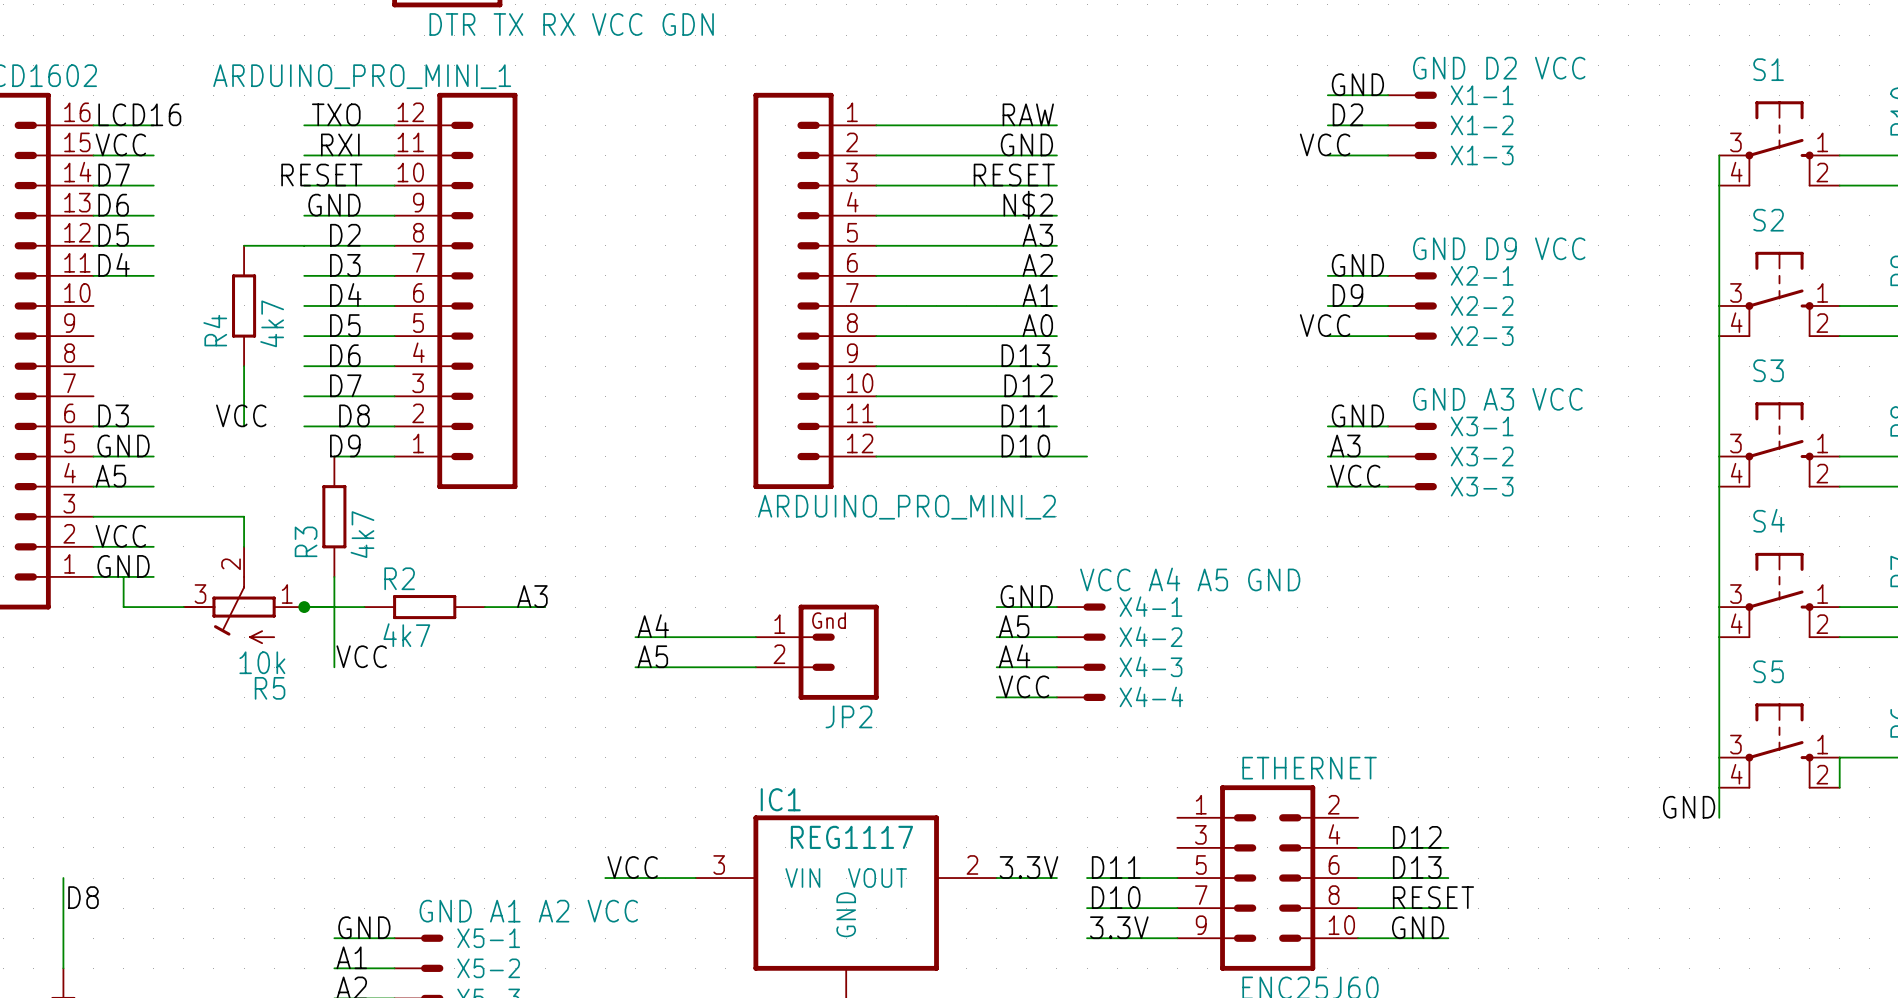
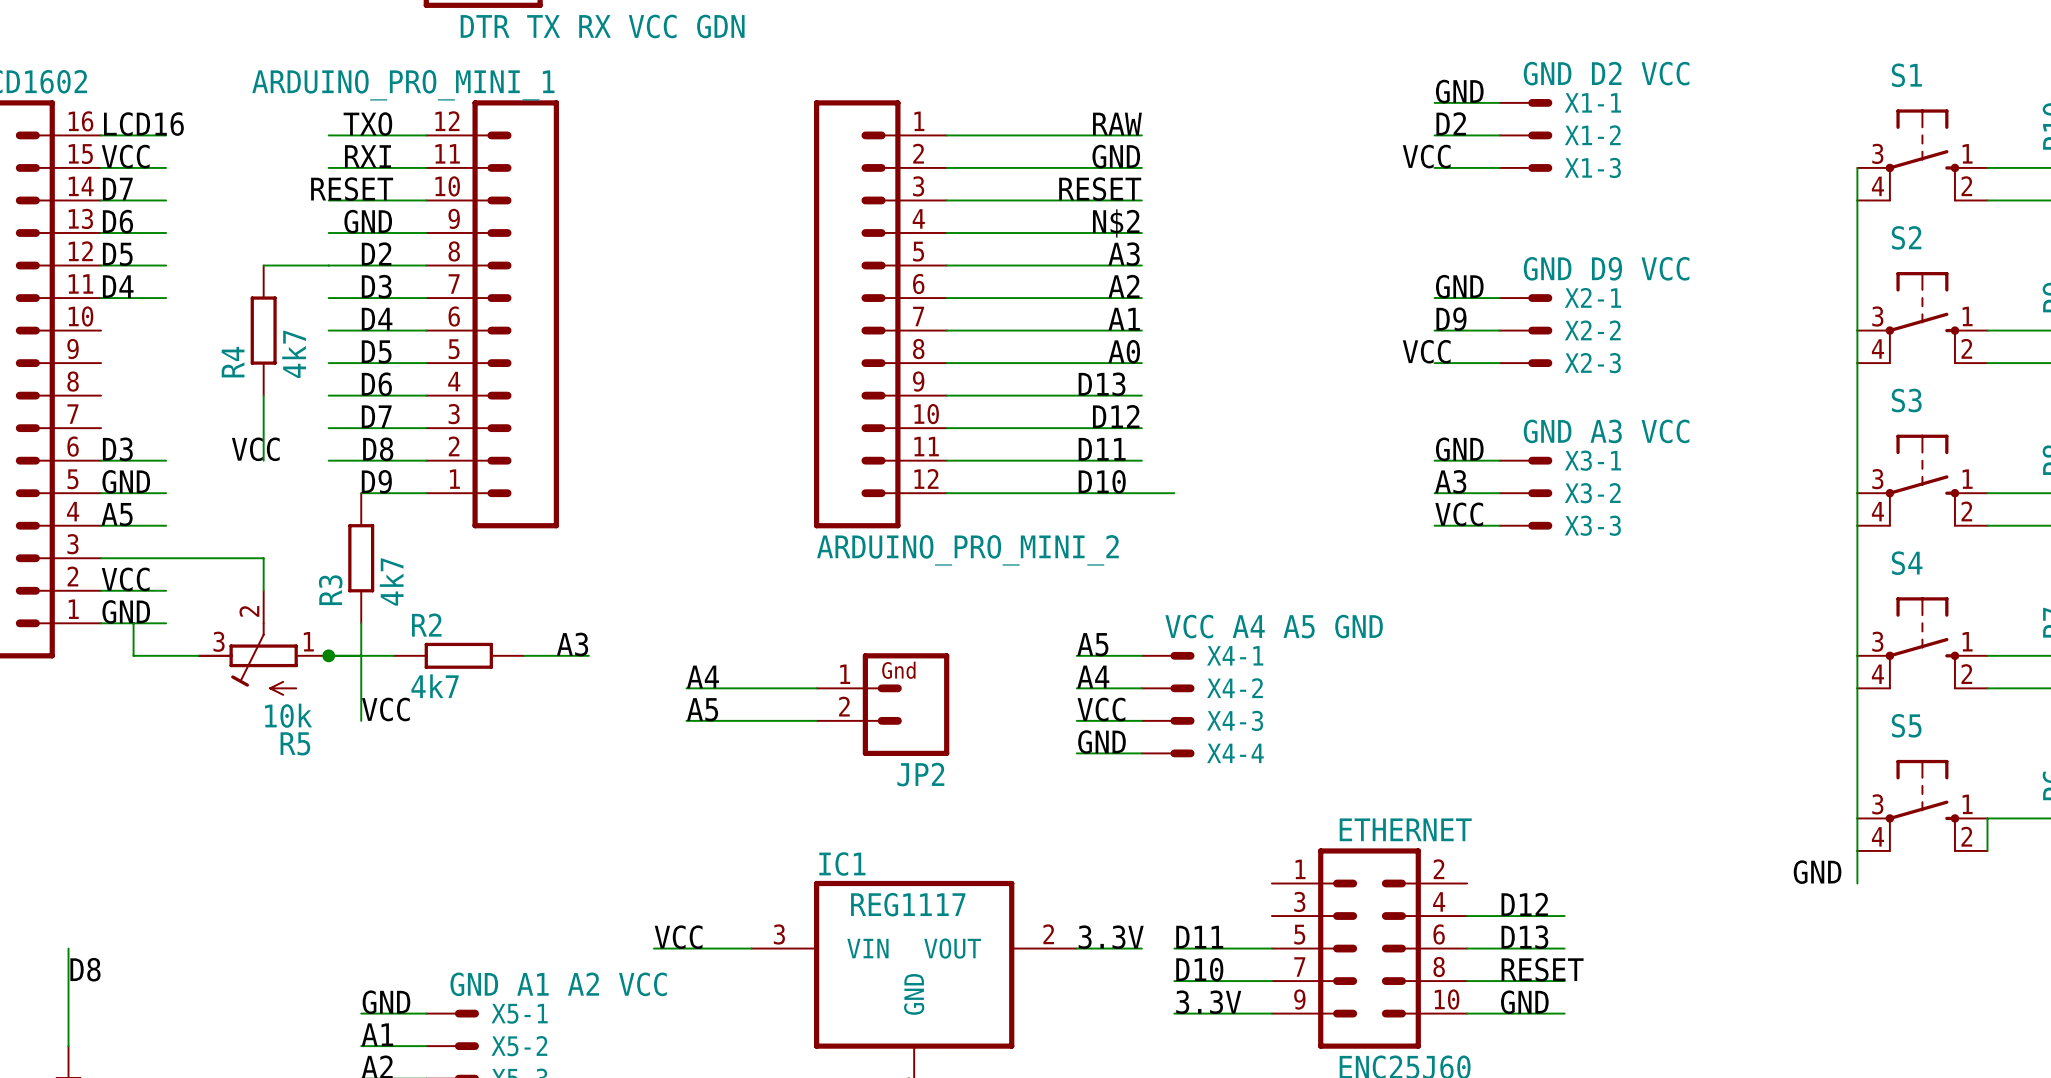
label: GND (1026, 596) -> A5 (1092, 644)
label: A5 (1014, 626) -> A4 (1093, 676)
label: A4 (1014, 656) -> VCC (1101, 709)
label: VCC (1024, 686) -> GND (1102, 742)

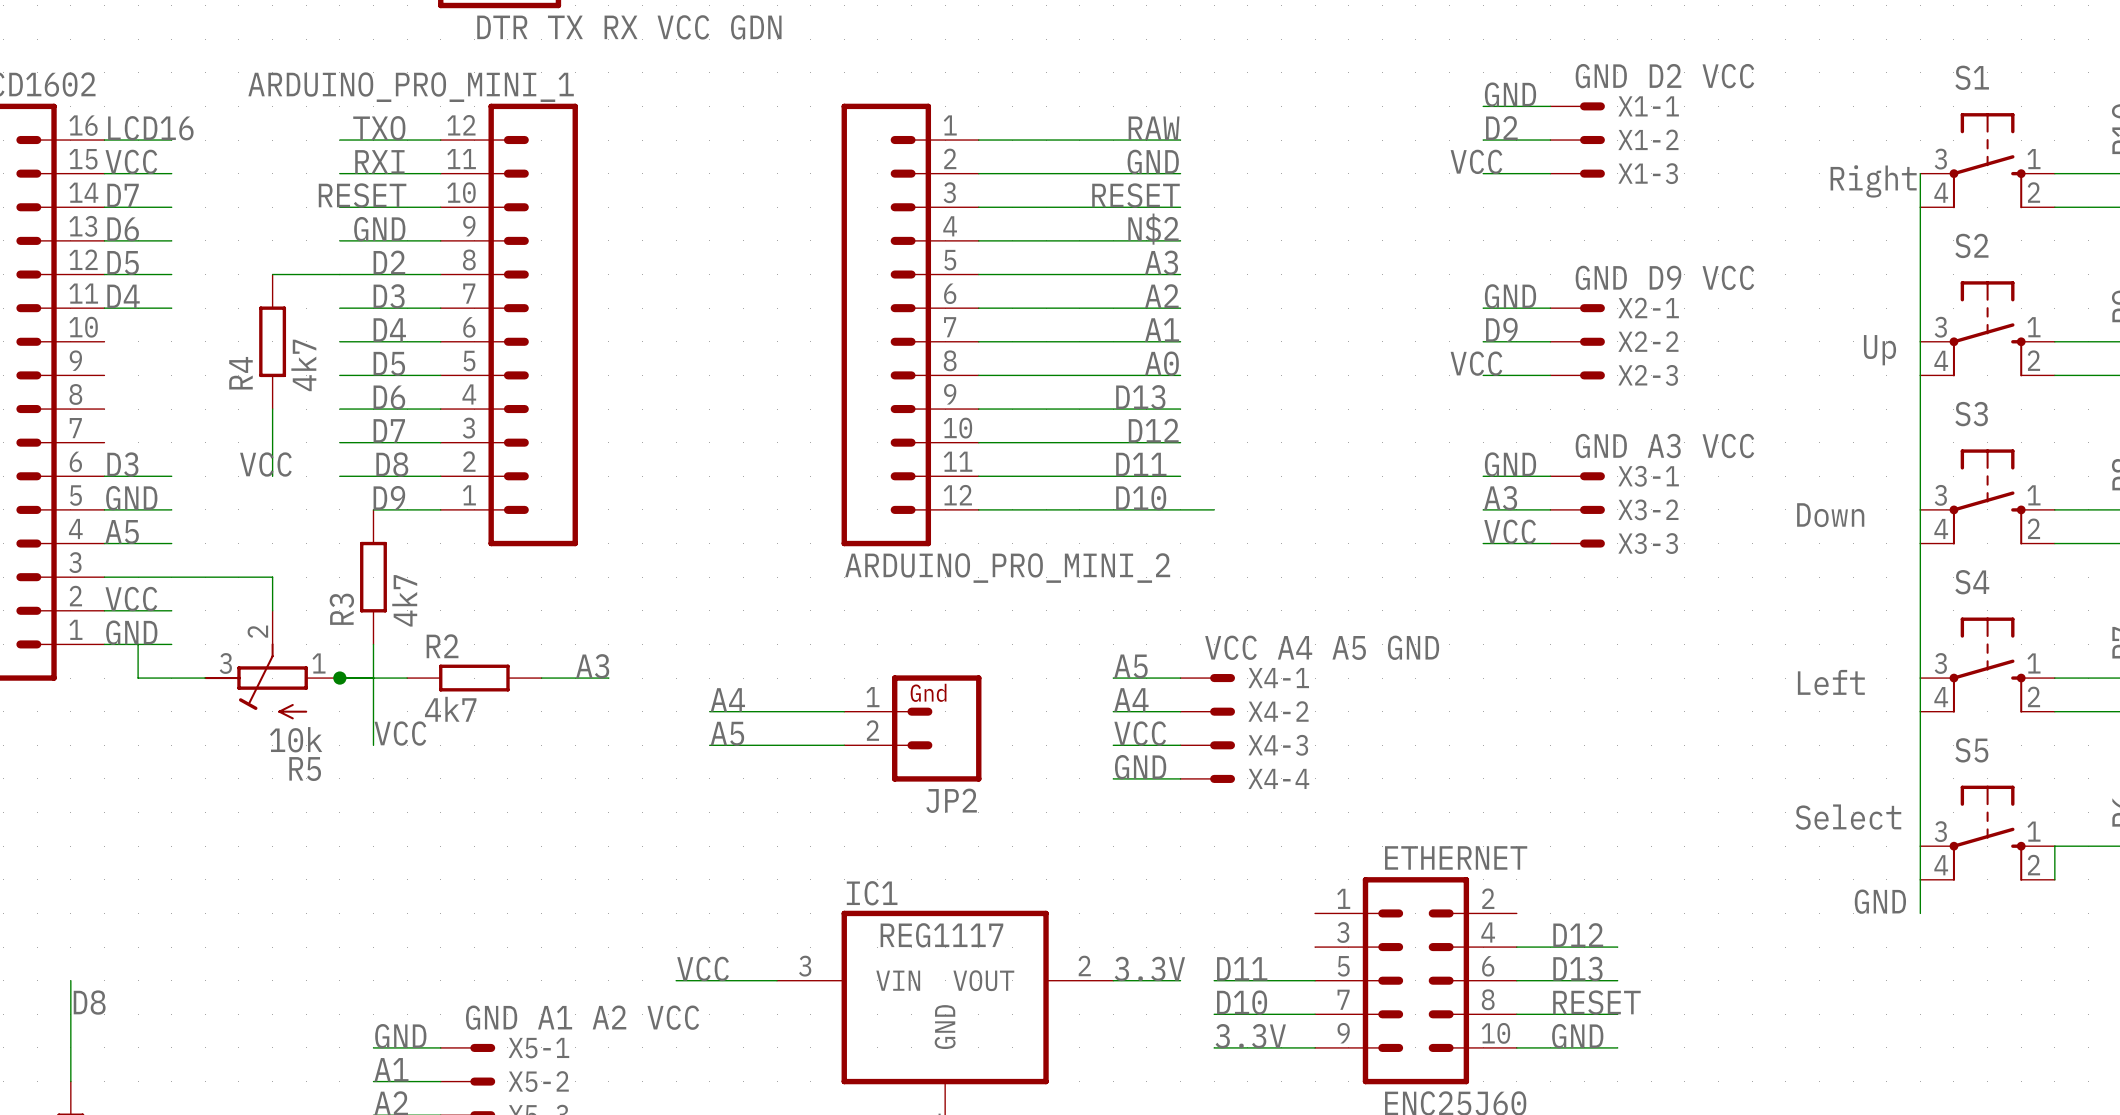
S1 value: none -> Right (1873, 181)
S2 value: none -> Up (1880, 350)
S3 value: none -> Down (1830, 515)
S4 value: none -> Left (1831, 682)
S5 value: none -> Select (1848, 817)

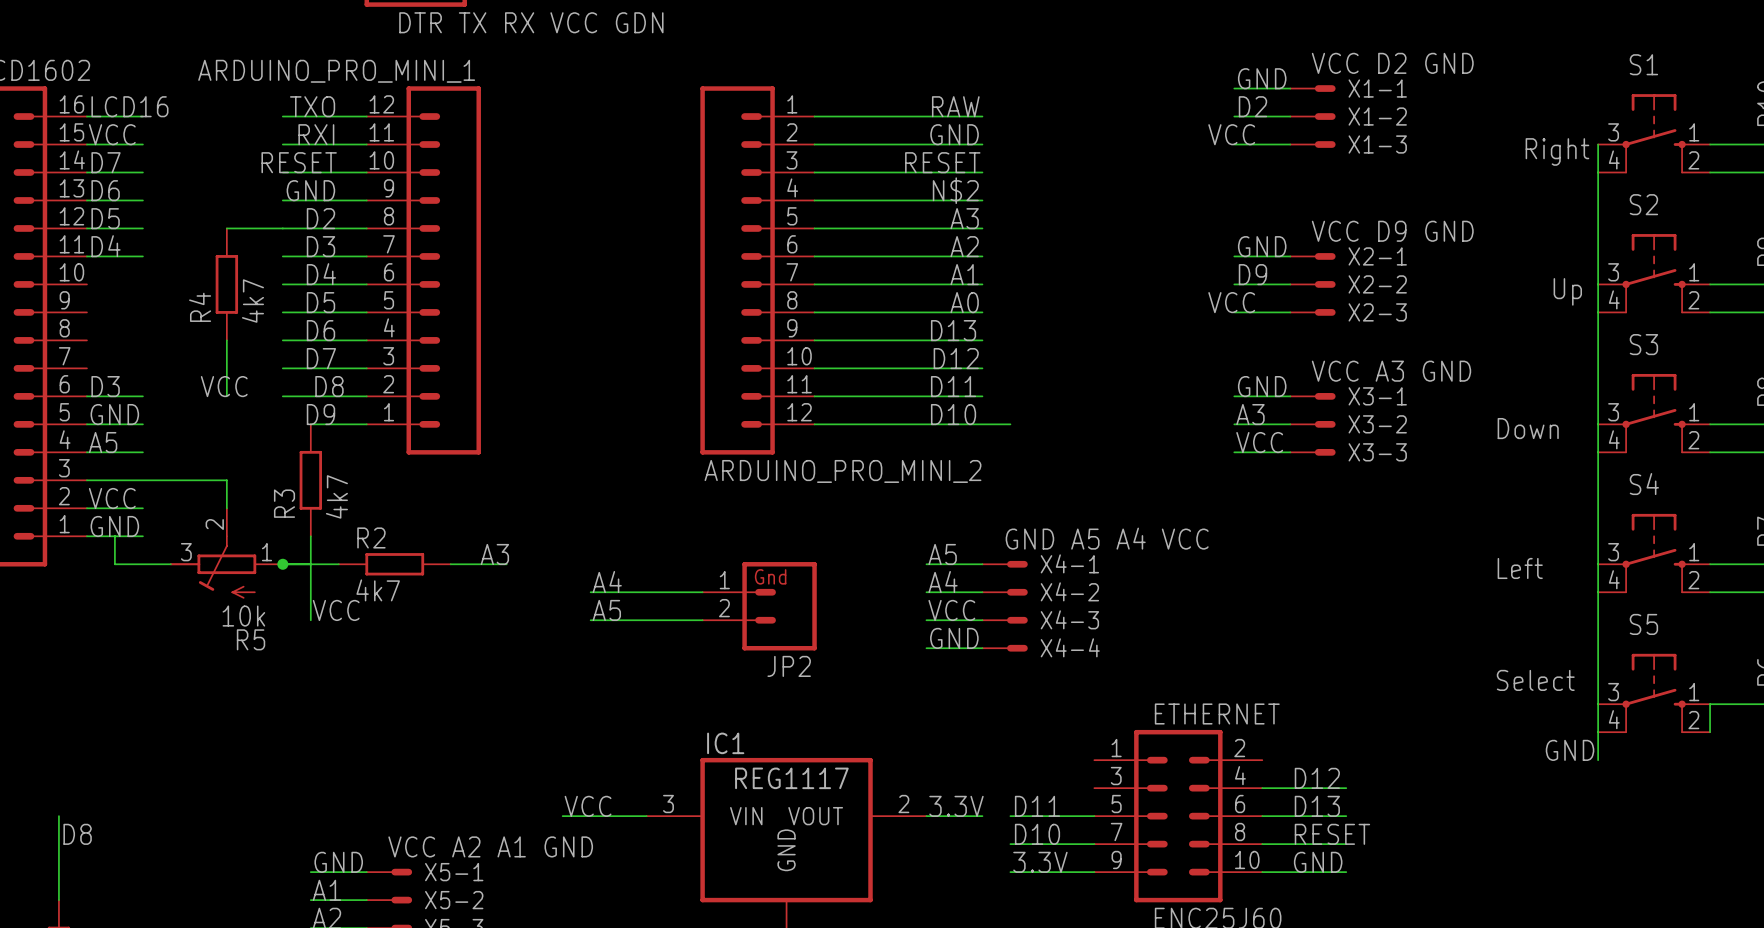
X1-1 value: GND D2 VCC (1664, 76) -> VCC D2 GND (1392, 63)
X2-1 value: GND D9 VCC (1664, 277) -> VCC D9 GND (1392, 231)
X3-1 value: GND A3 VCC (1664, 446) -> VCC A3 GND (1391, 371)
X4-1 value: VCC A4 A5 GND (1322, 647) -> GND A5 A4 VCC (1107, 538)
X5-1 value: GND A1 A2 VCC (582, 1017) -> VCC A2 A1 GND (490, 846)

